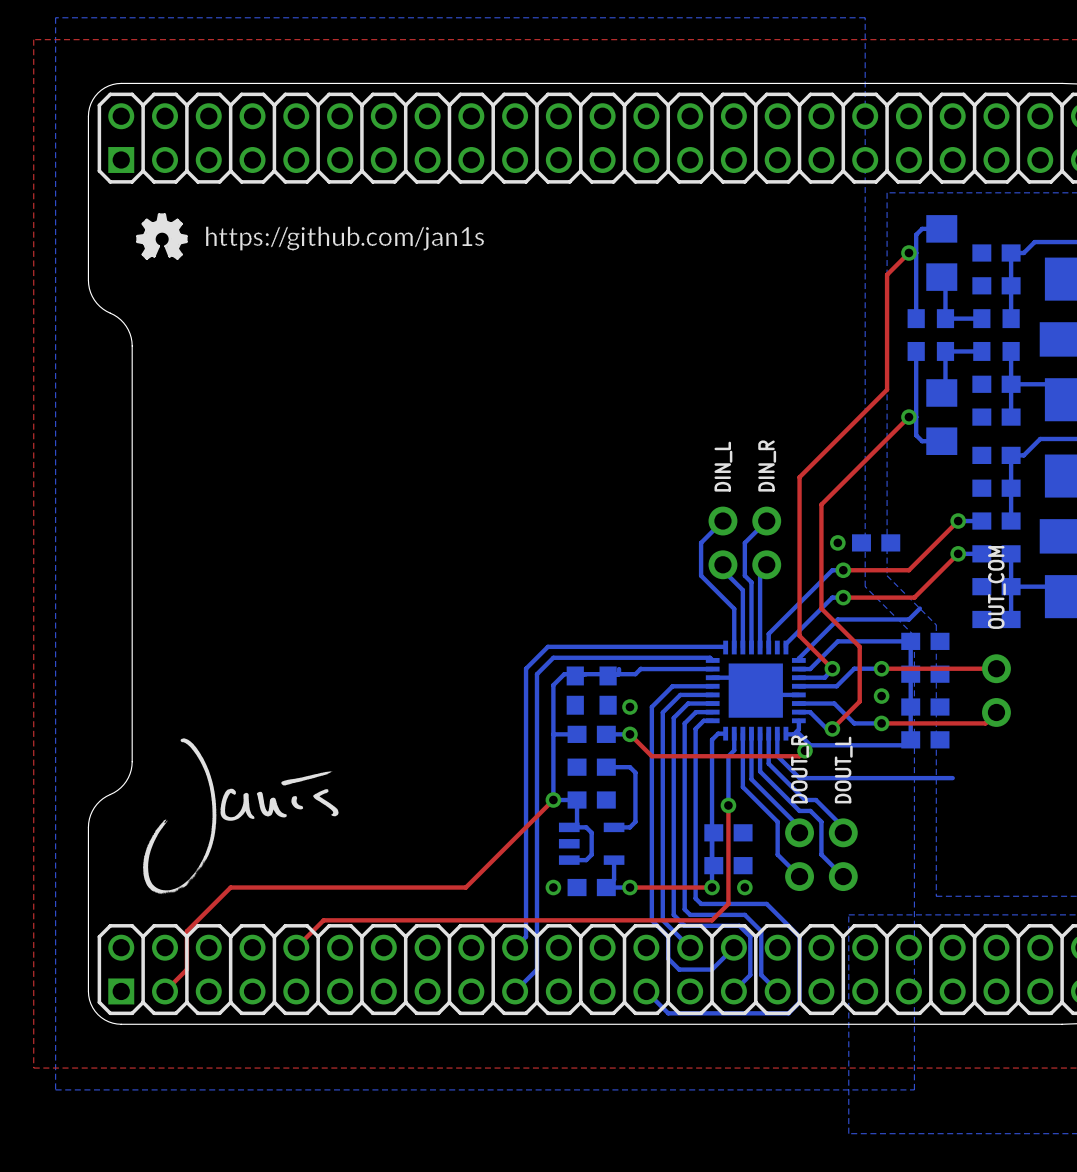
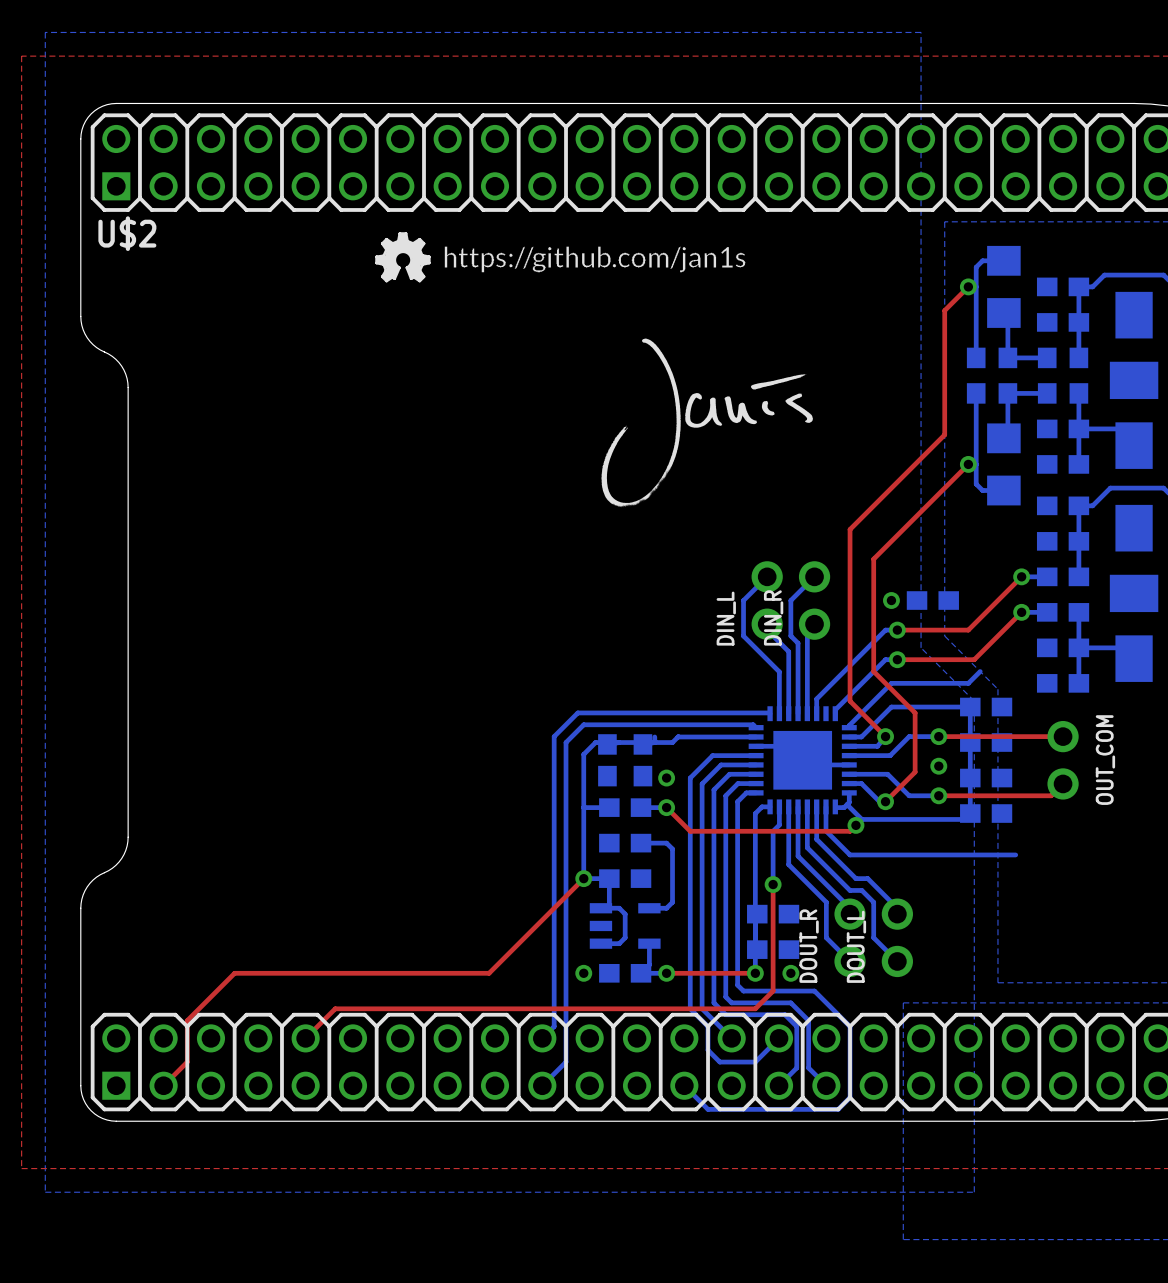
U$2 name: none -> U$2 (127, 233)
drawing position: (161, 236) -> (402, 257)
drawing position: (345, 238) -> (595, 259)
drawing: none -> [601, 338, 813, 508]
DIN_L name position: DIN_L (723, 466) -> DIN_L (726, 618)
DIN_R name position: DIN_R (767, 466) -> DIN_R (773, 617)
OUT_COM name position: OUT_COM (996, 587) -> OUT_COM (1105, 760)
drawing: [143, 738, 339, 895] -> none
DOUT_R name position: DOUT_R (800, 769) -> DOUT_R (809, 946)
DOUT_L name position: DOUT_L (843, 770) -> DOUT_L (856, 946)

